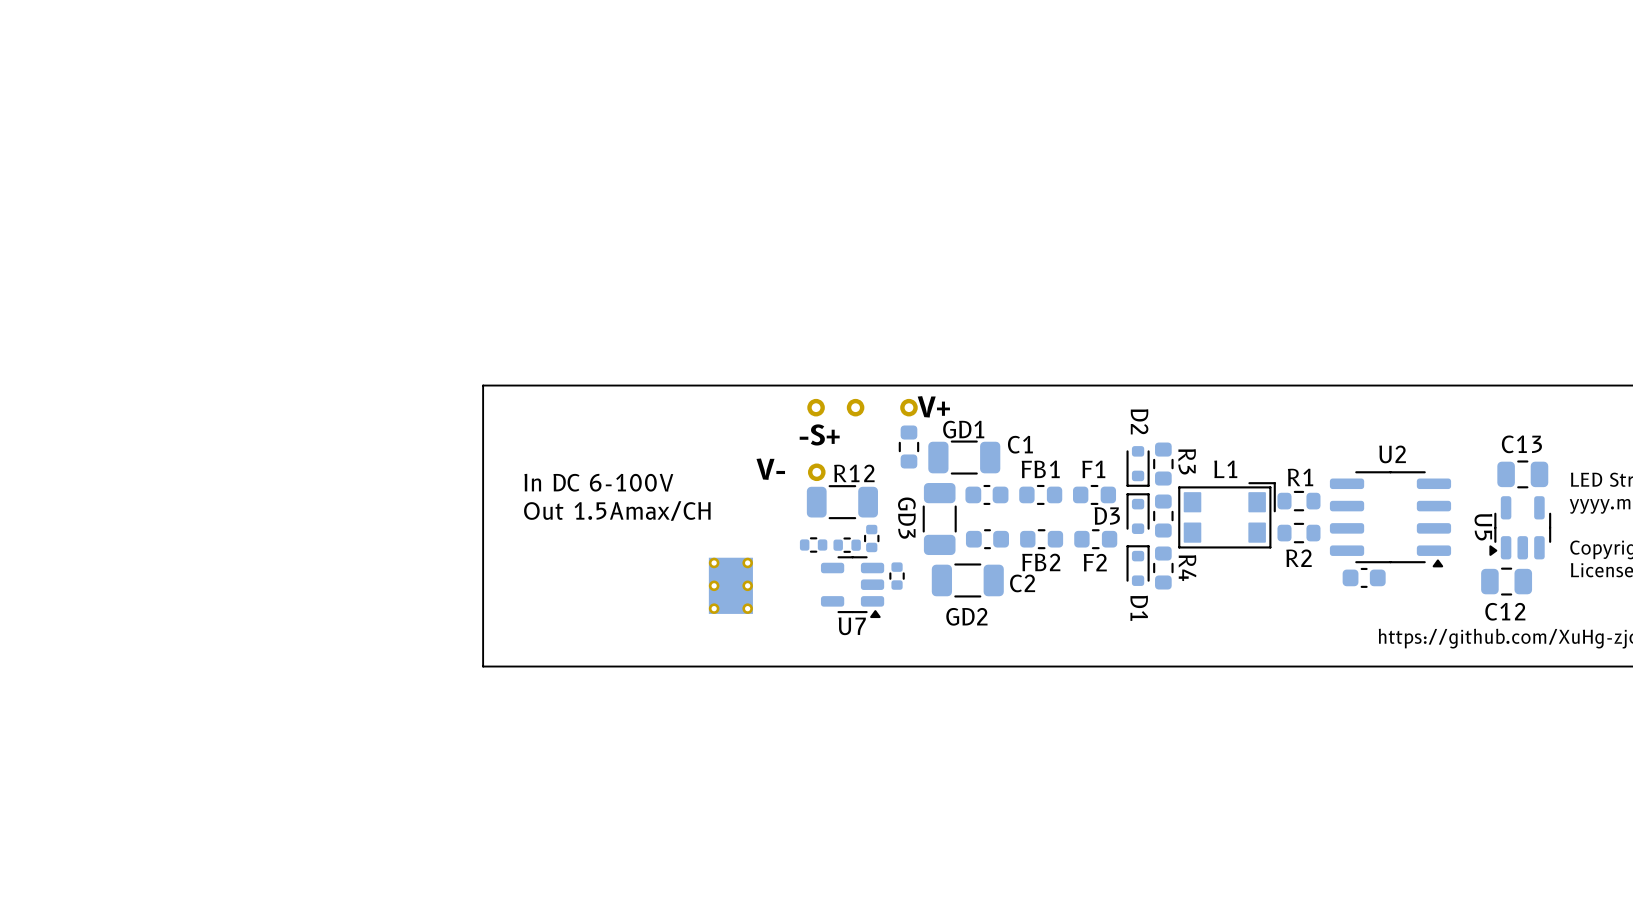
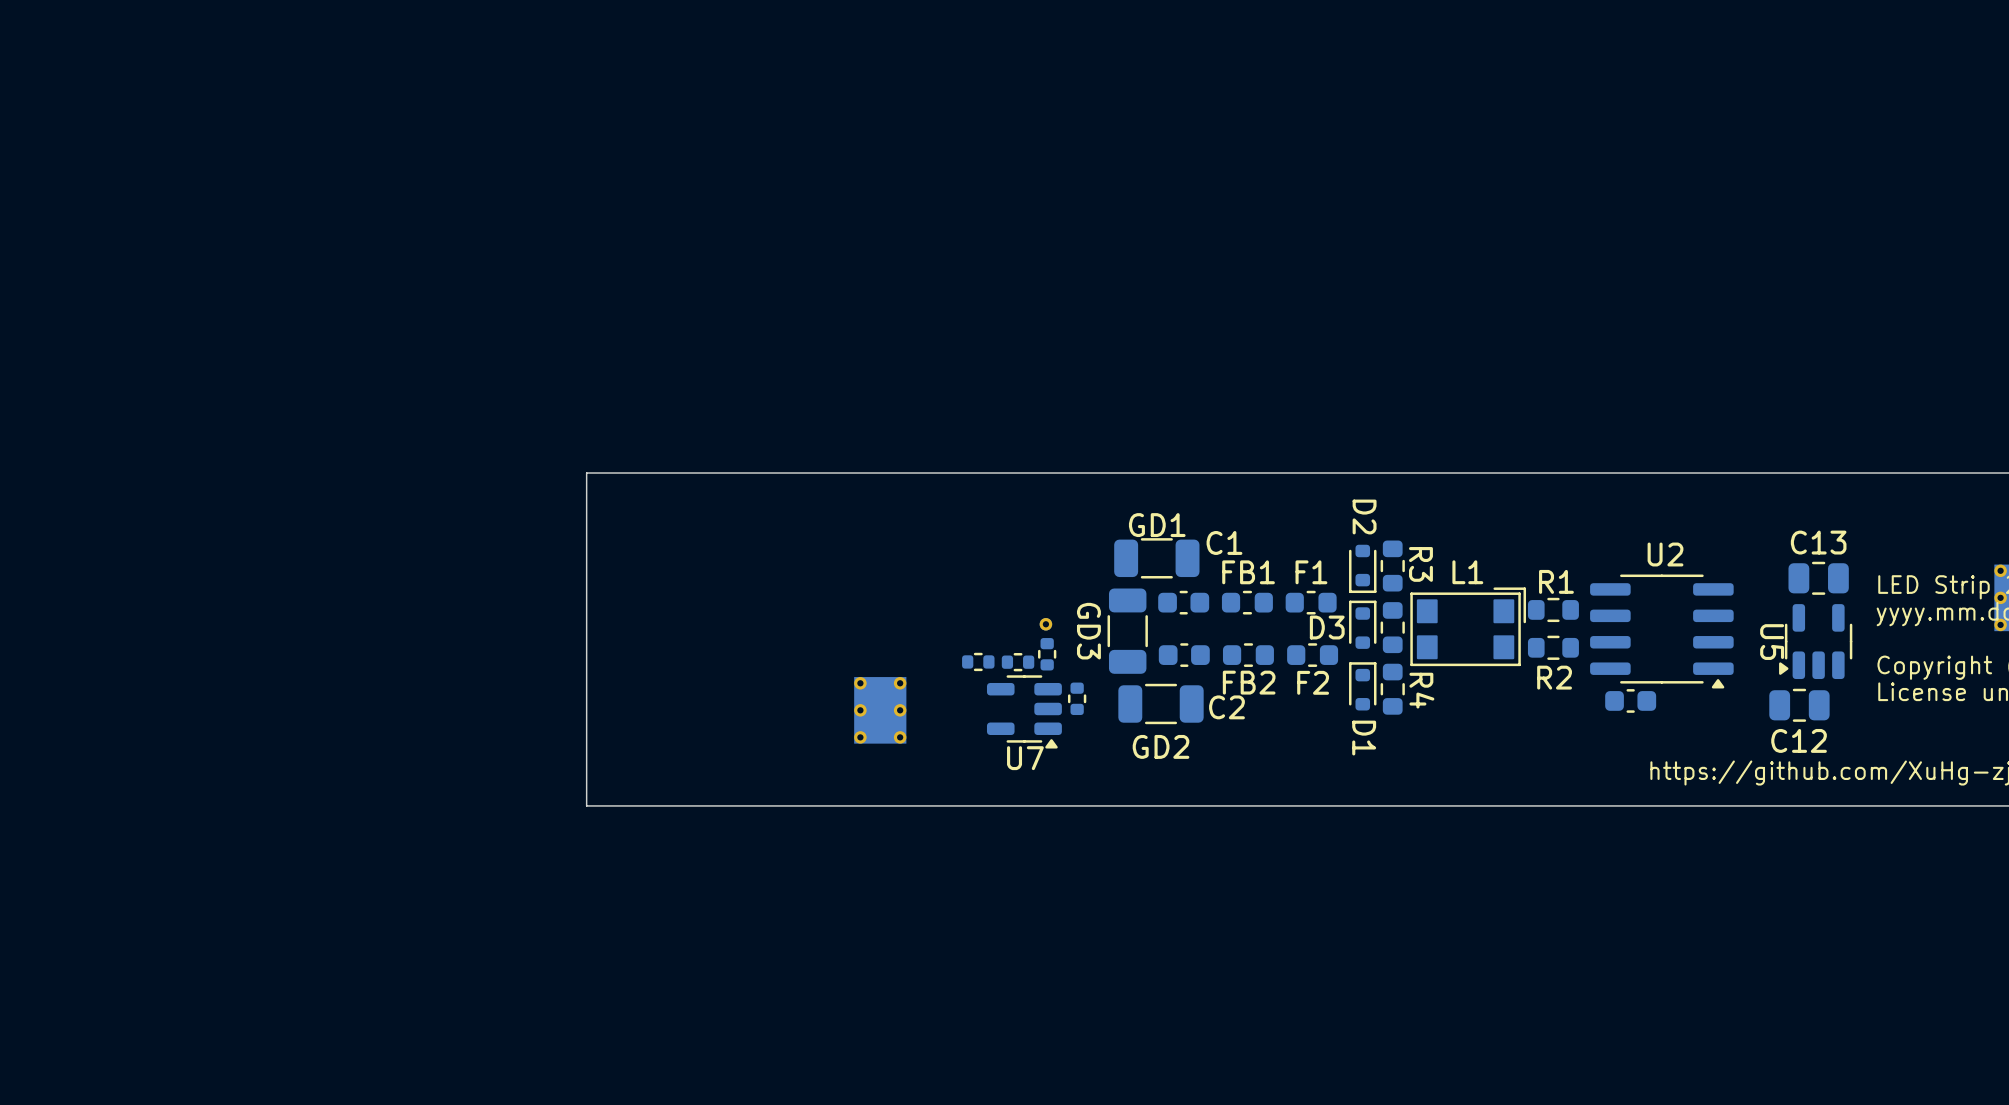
text: V+ (933, 406) -> none
part: (816, 407) -> none
part: (855, 407) -> none
part: (908, 407) -> none
text: -S+ (819, 434) -> none
part: (908, 447) -> none
text: V- (770, 469) -> none
part: (816, 472) -> none
text: In DC 6-100V (598, 482) -> none
R12: (842, 502) -> none
text: Out 1.5Amax/CH (617, 511) -> none
part: none -> (1045, 624)

